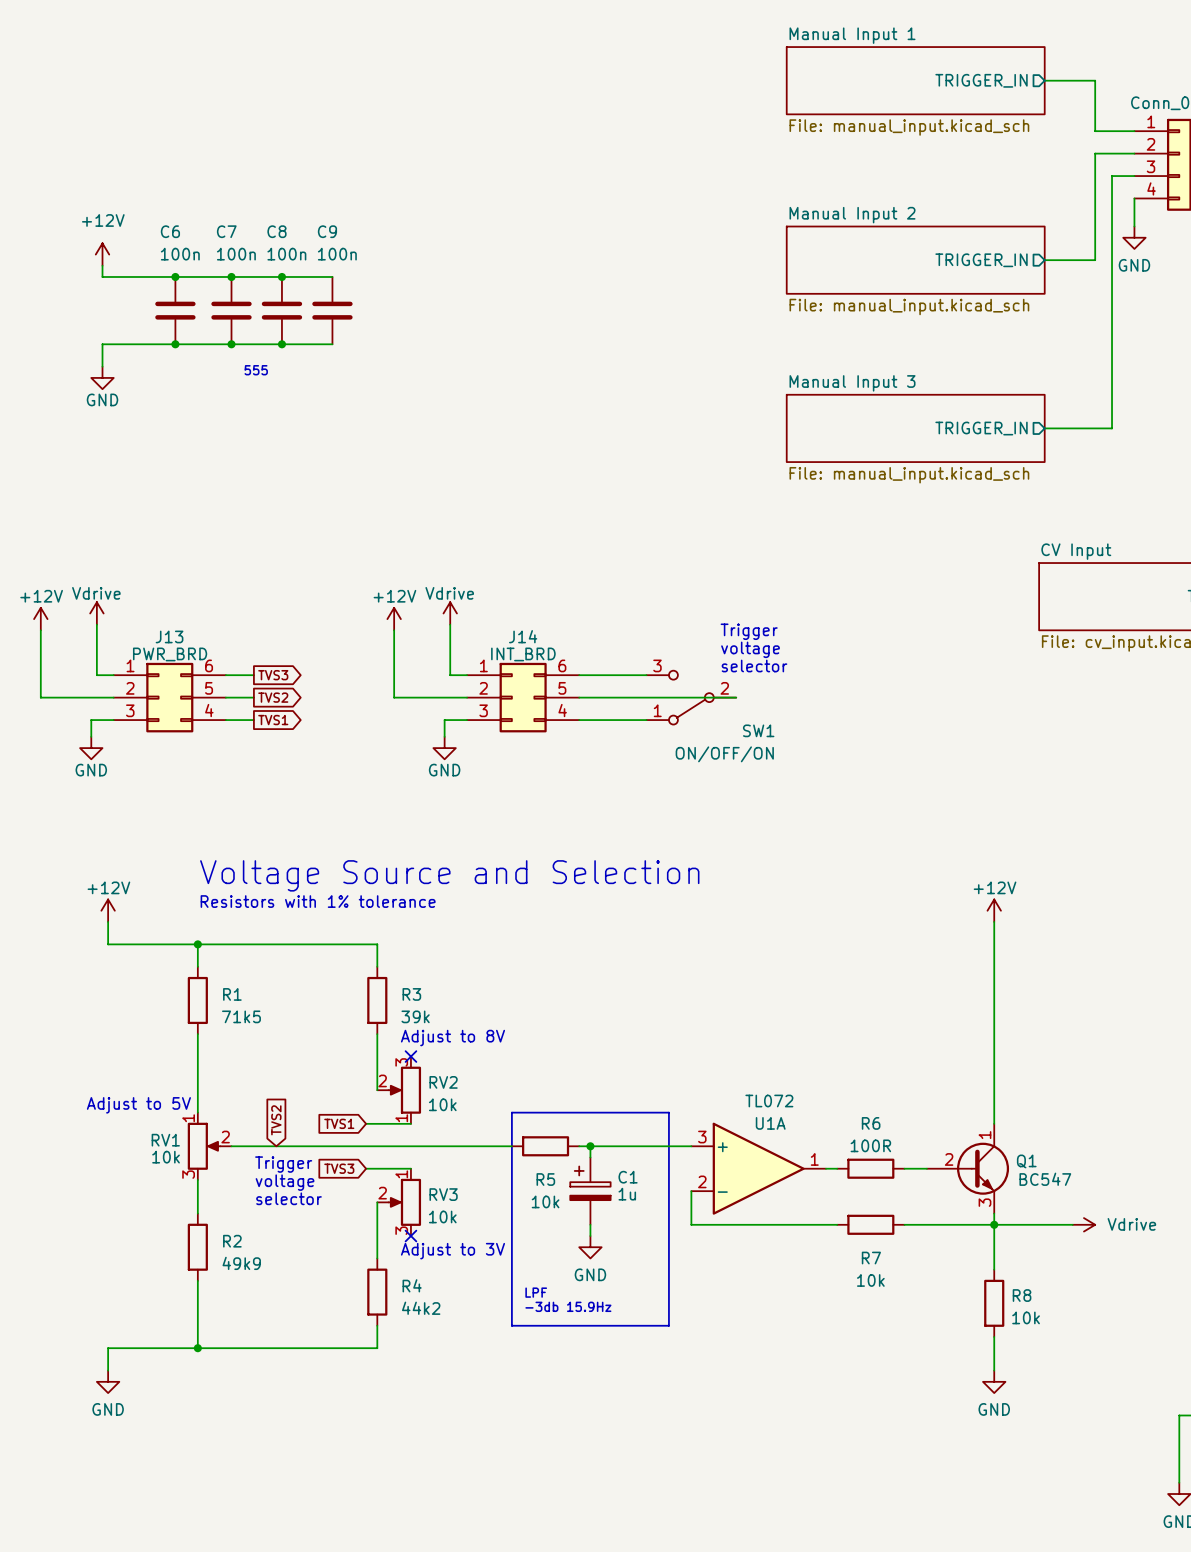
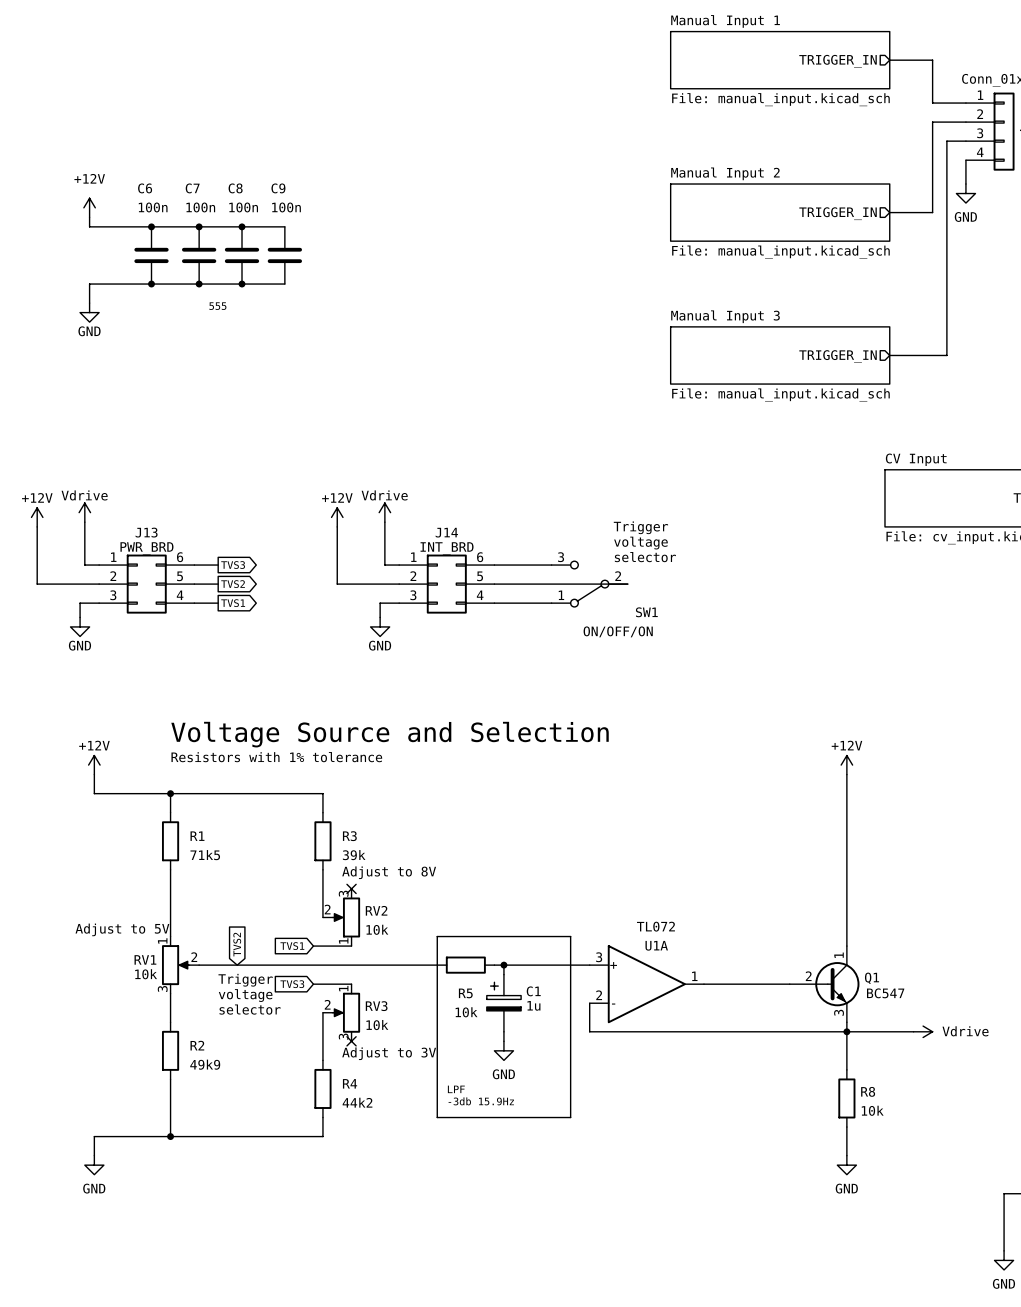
wire: none -> (713, 984) (770, 984)
R6: 100R (870, 1168) -> none
wire: none -> (713, 1031) (770, 1031)
R7: 10k (870, 1224) -> none

